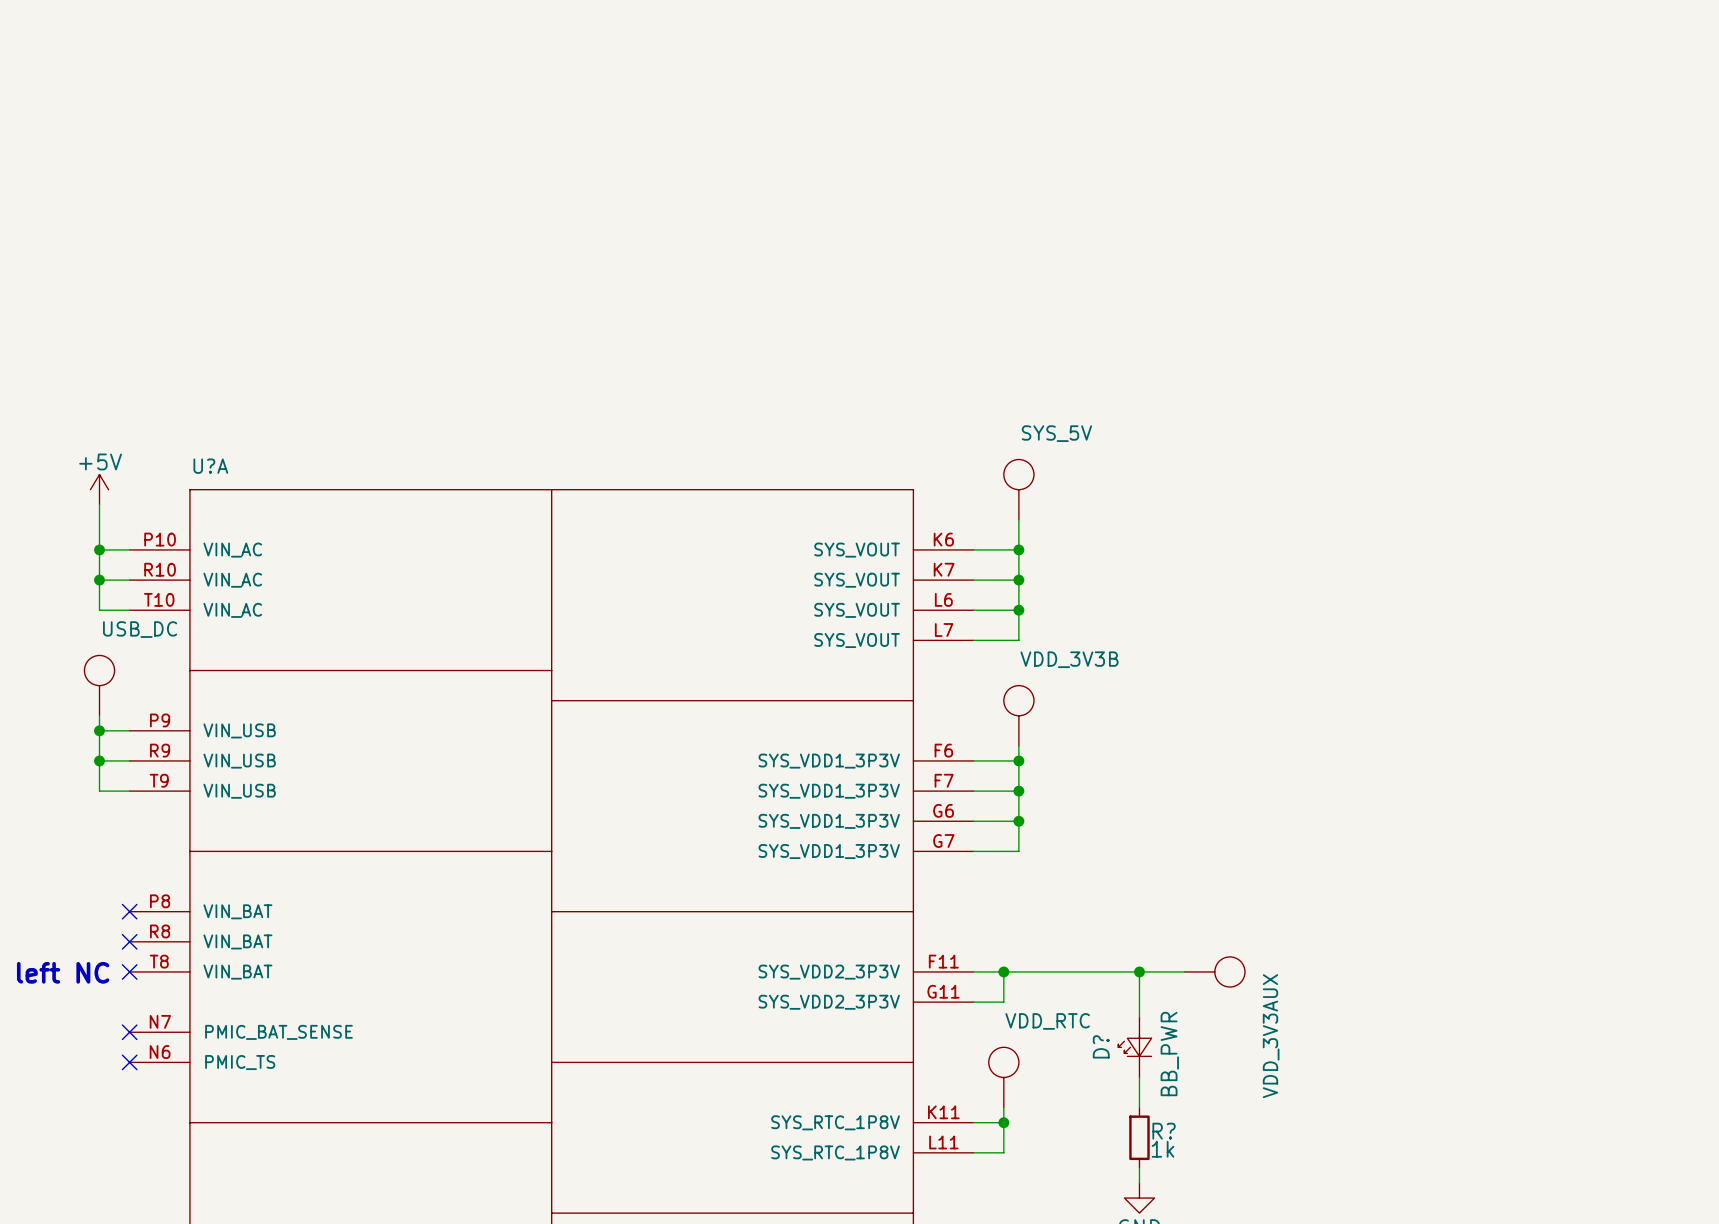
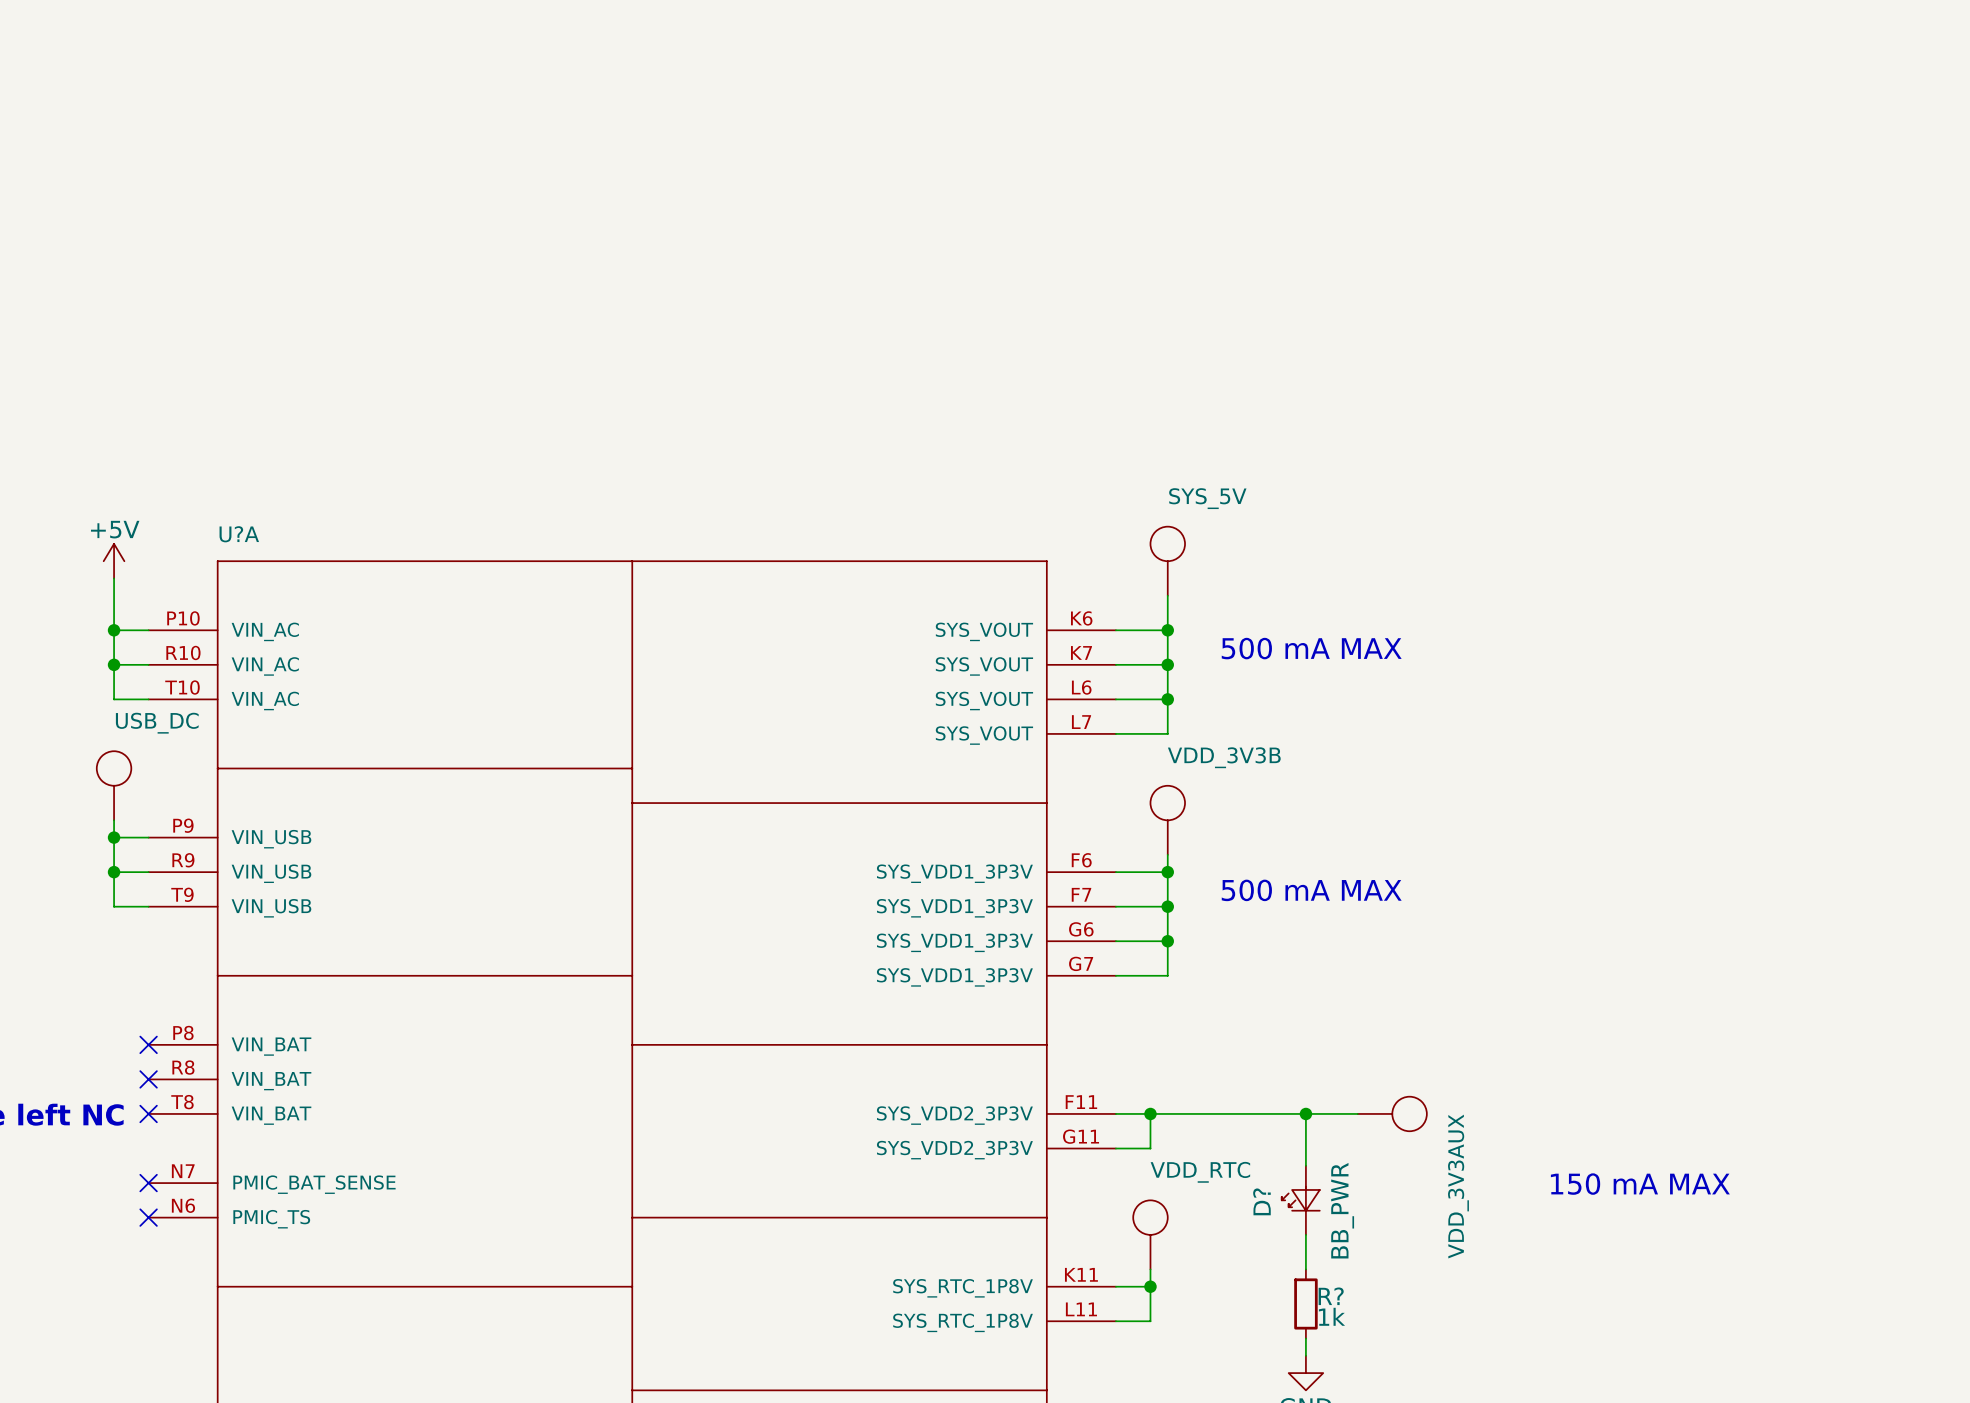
text: none -> 500 mA MAX (1311, 648)
text: none -> 500 mA MAX (1311, 890)
text: none -> 150 mA MAX (1640, 1184)

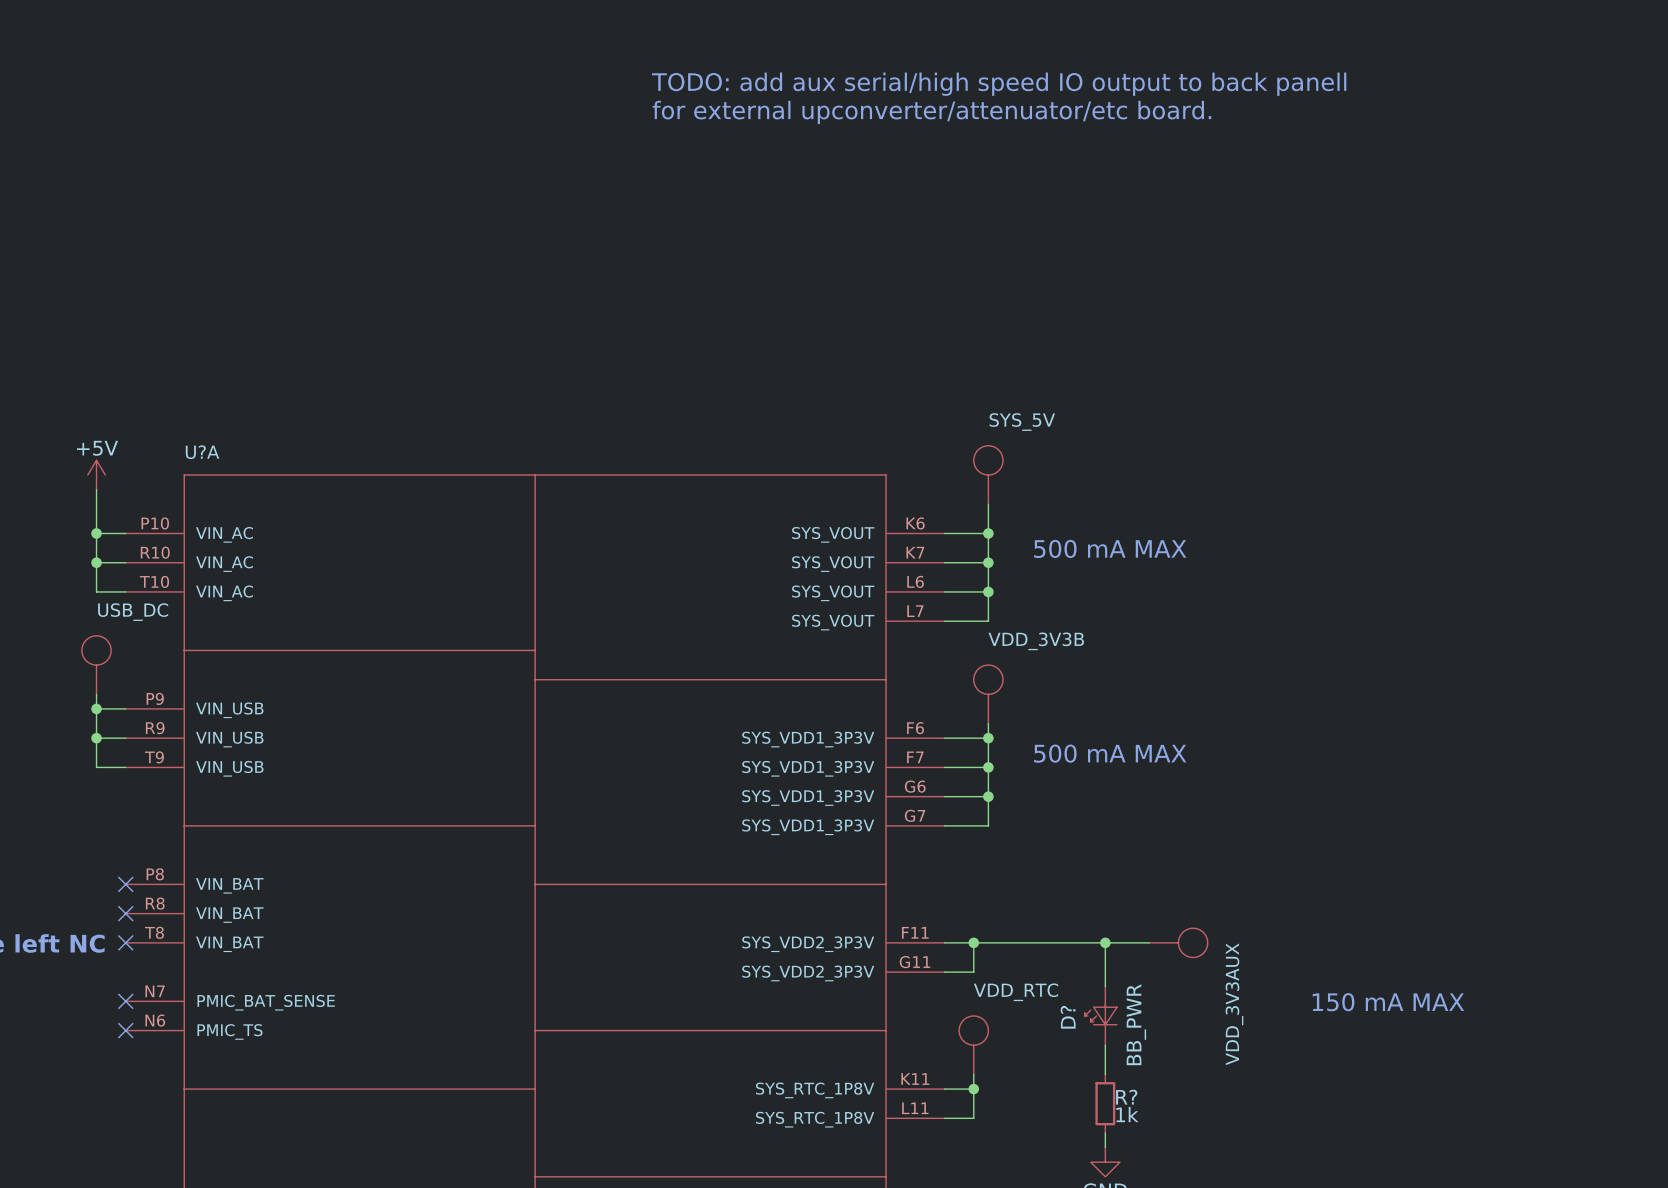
text: none -> TODO: add aux serial/high speed IO output to back panell (999, 84)
text: none -> for external upconverter/attenuator/etc board. (931, 112)

